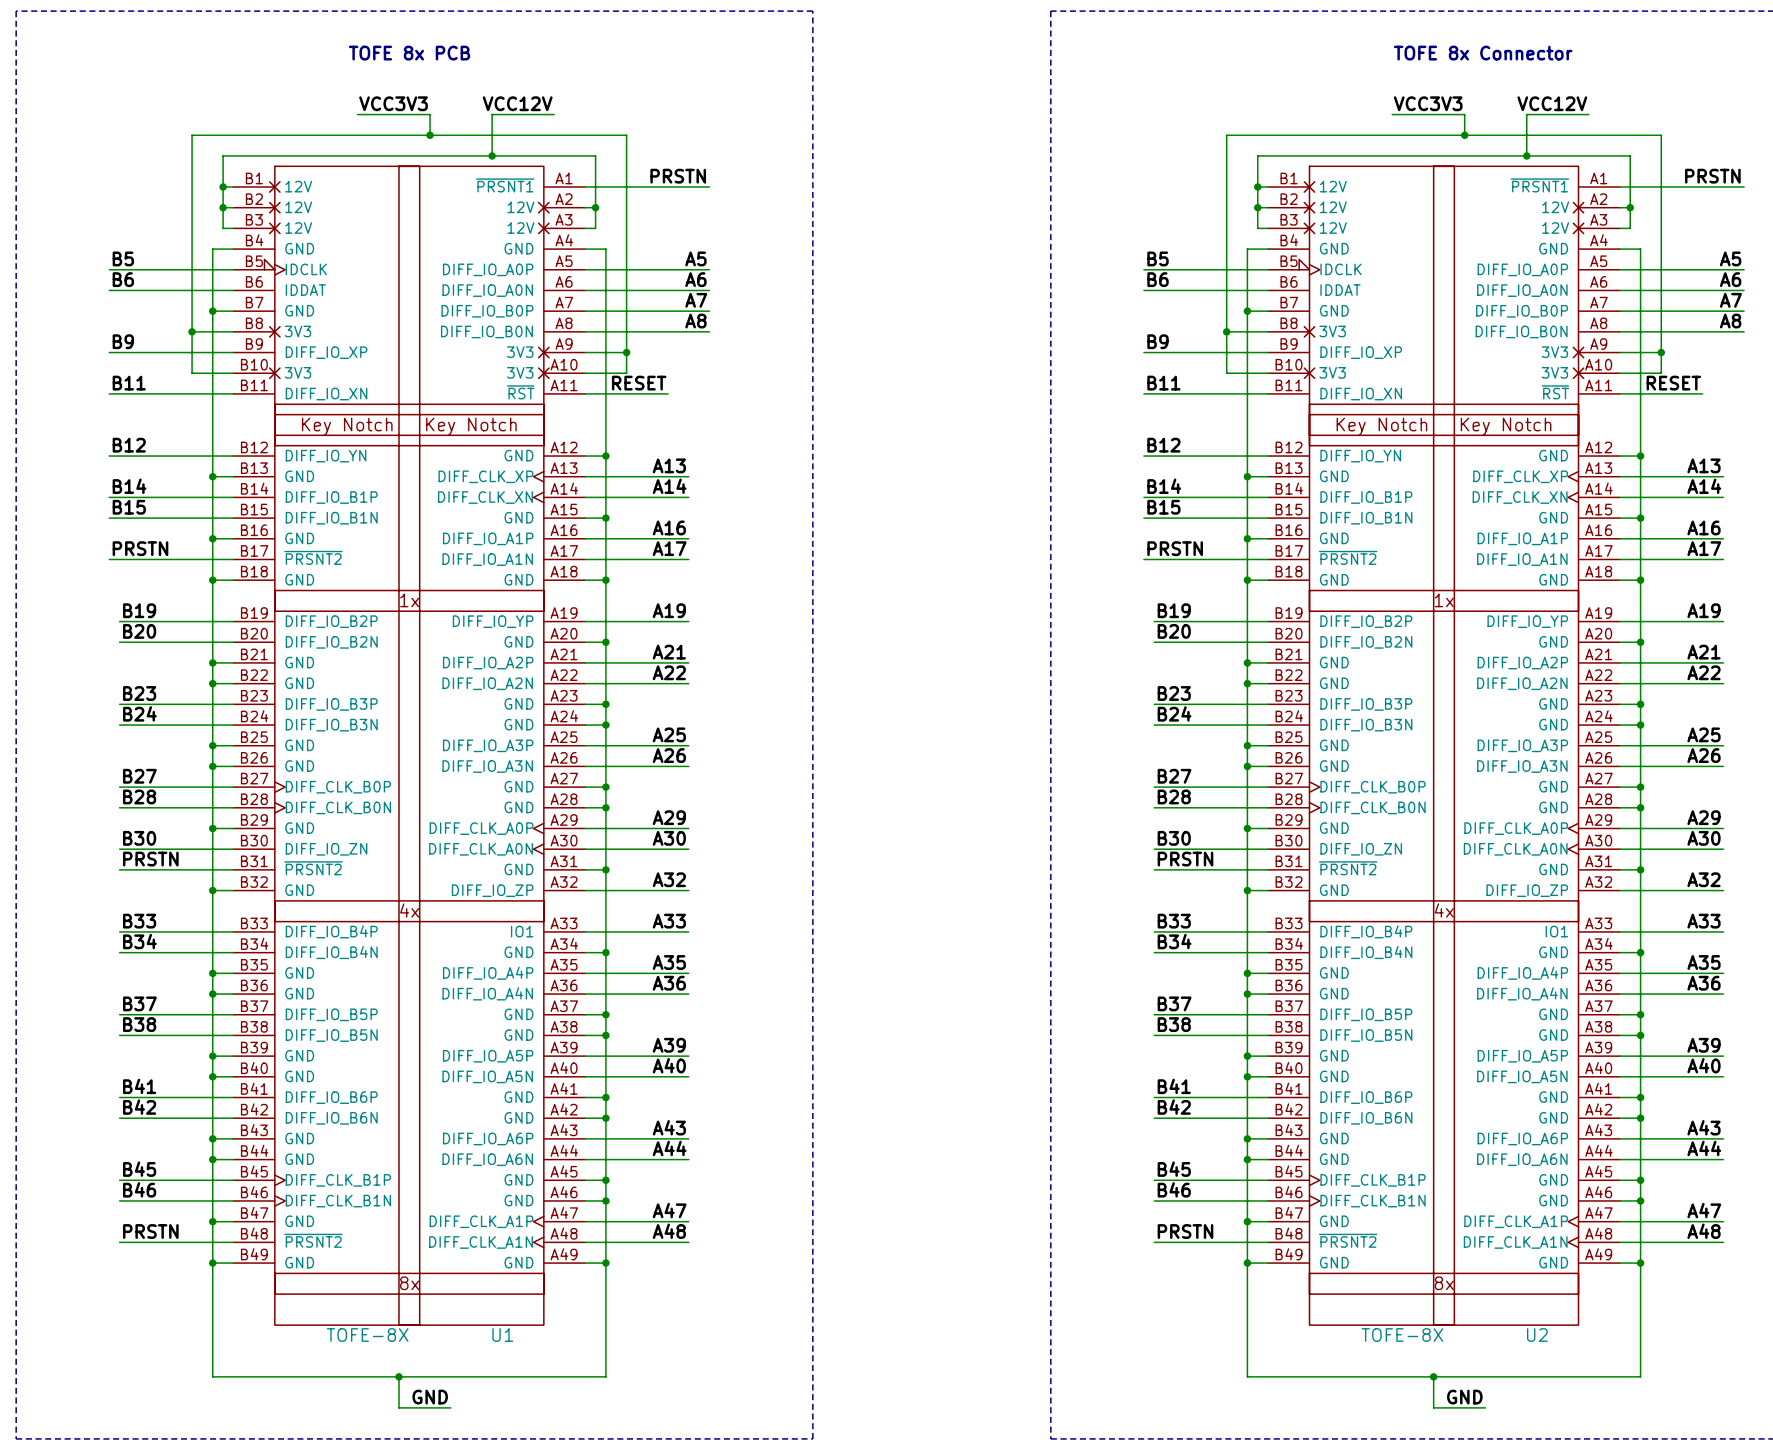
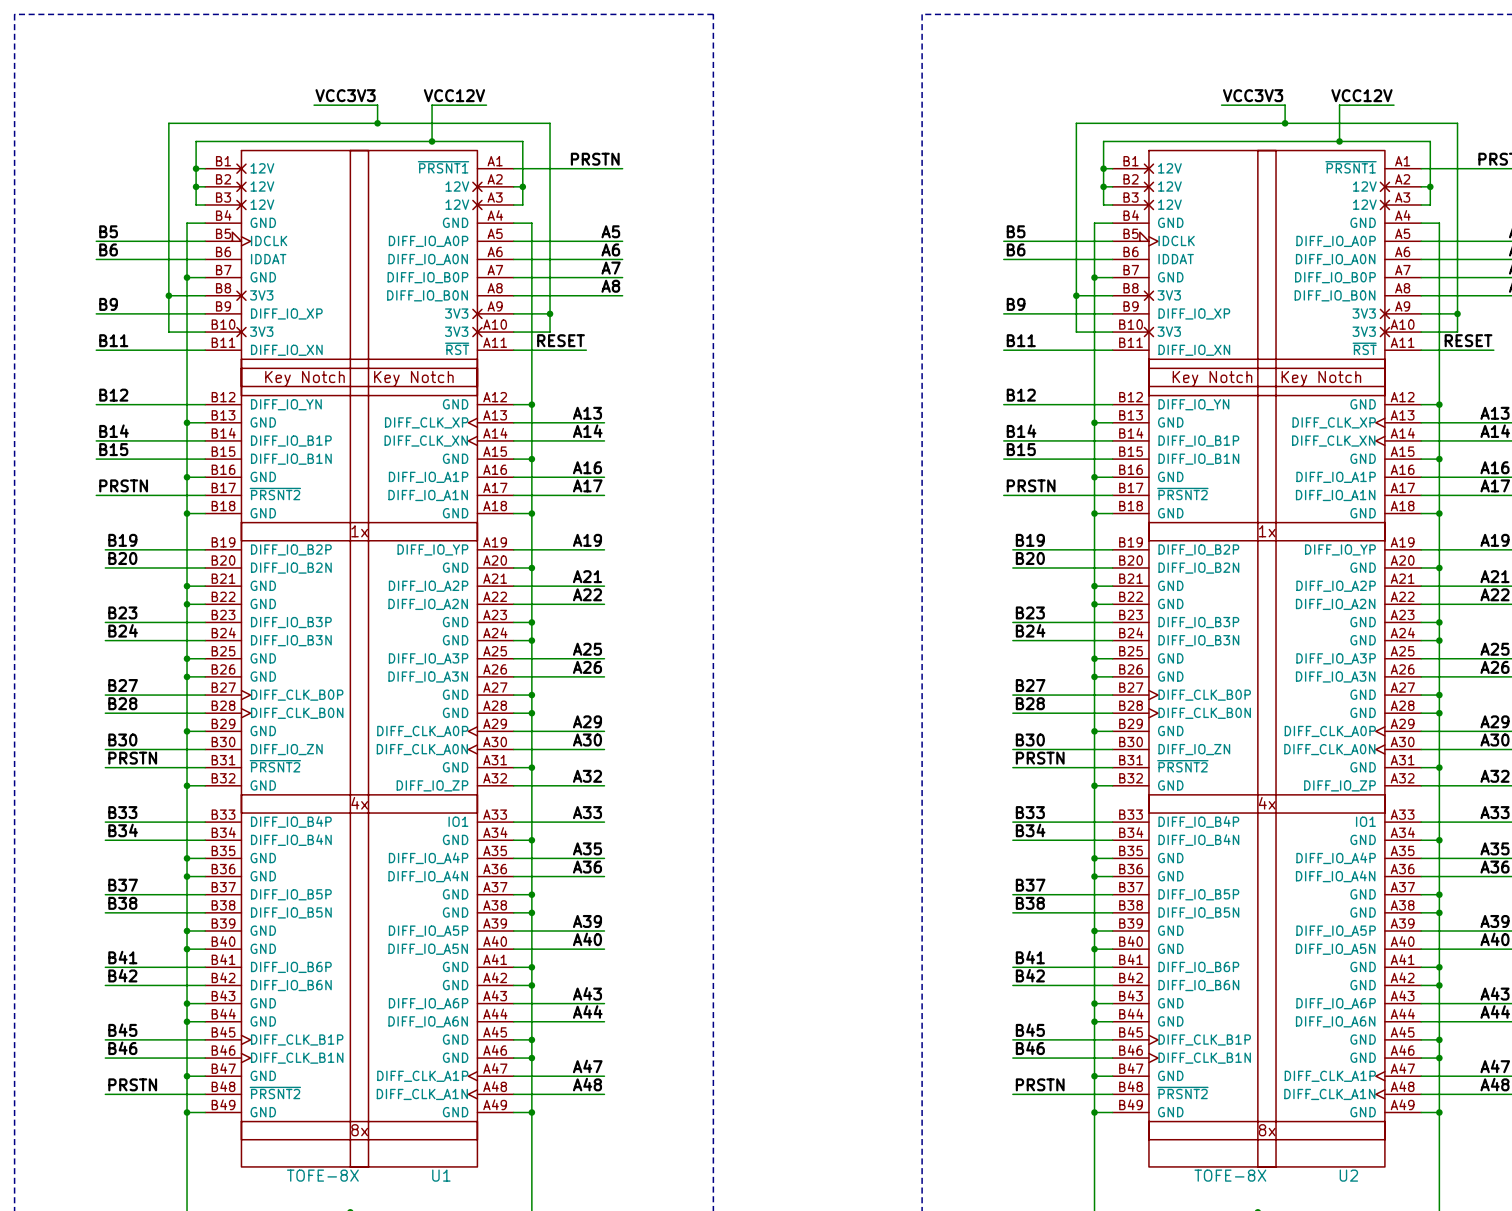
text: TOFE 8x PCB (409, 53) -> none
text: TOFE 8x Connector (1483, 53) -> none

